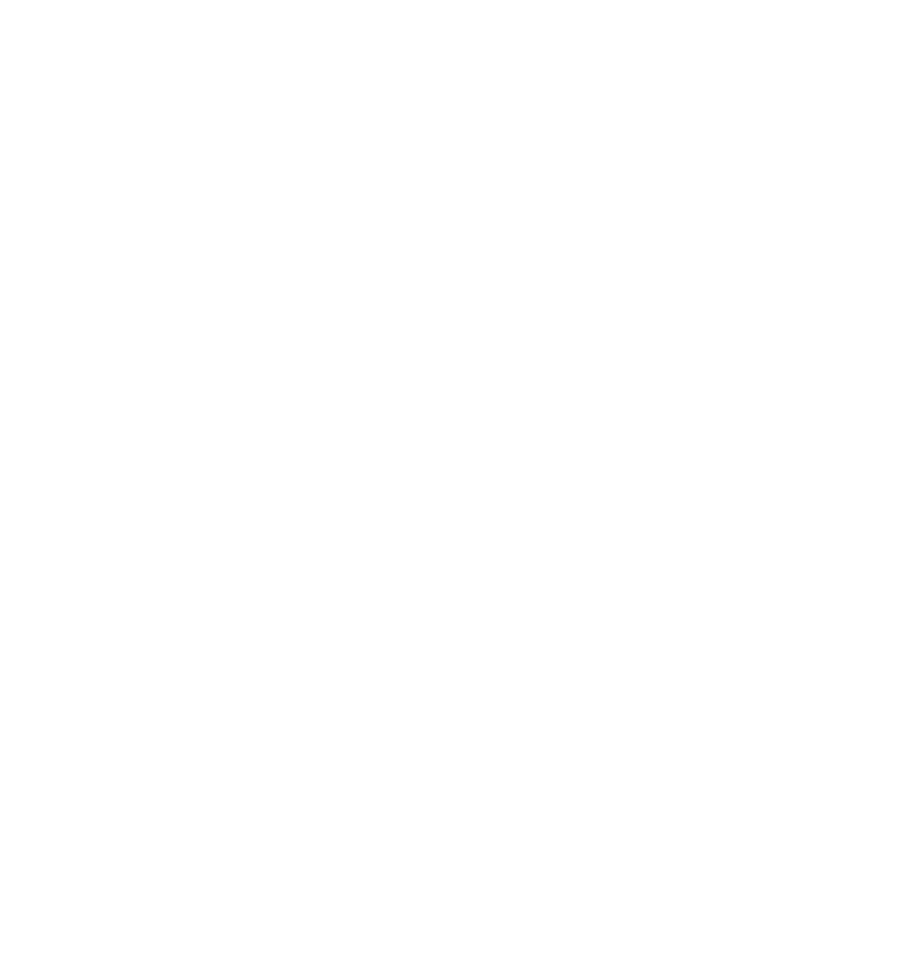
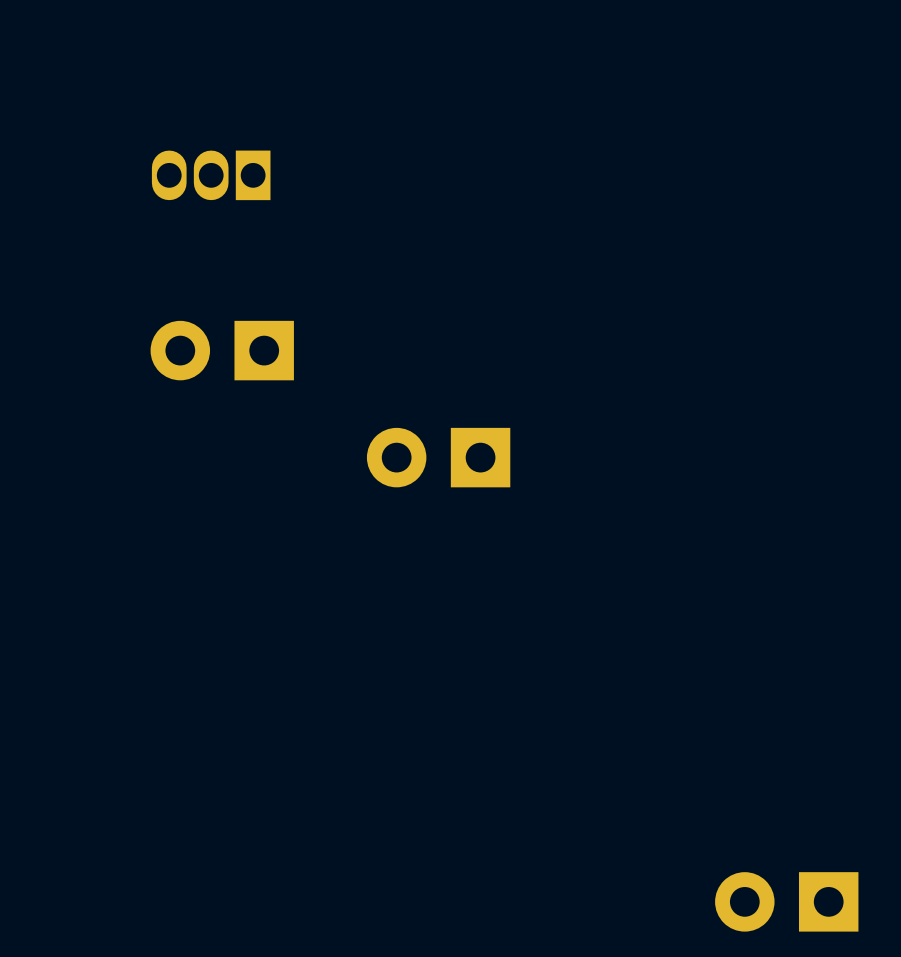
part: none -> (211, 175)
part: none -> (222, 350)
part: none -> (438, 457)
part: none -> (786, 901)

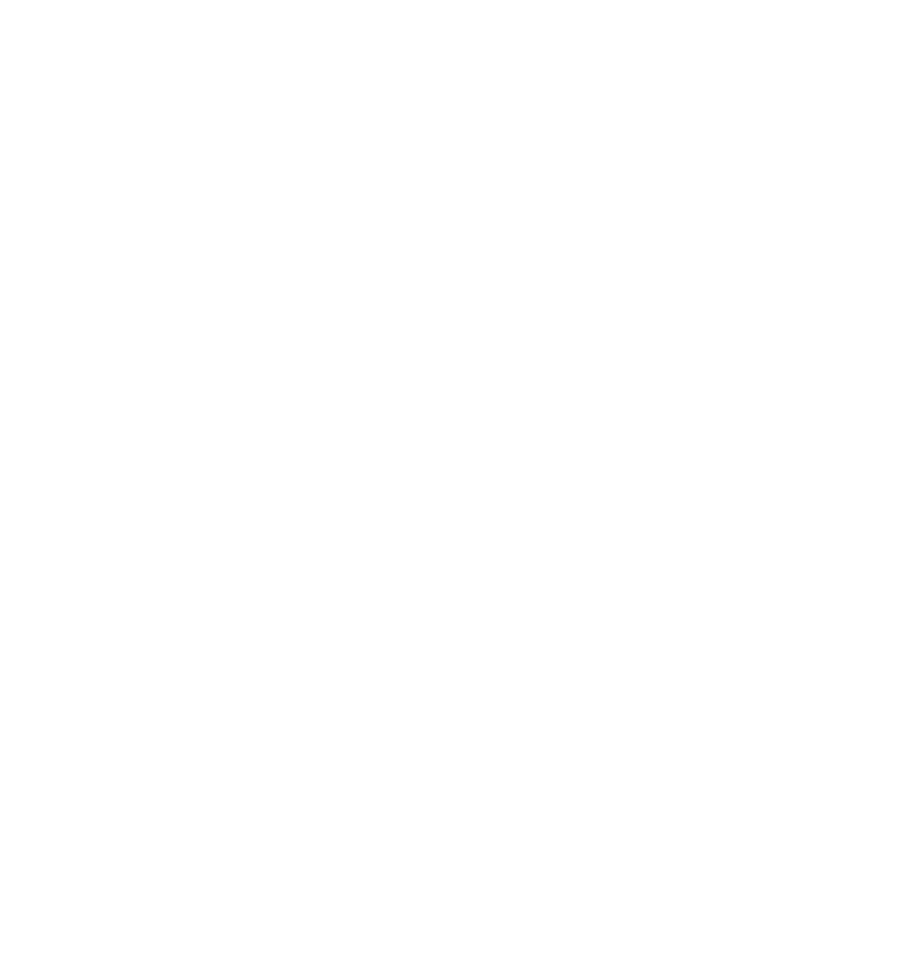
part: (211, 175) -> none
part: (222, 350) -> none
part: (438, 457) -> none
part: (786, 901) -> none

